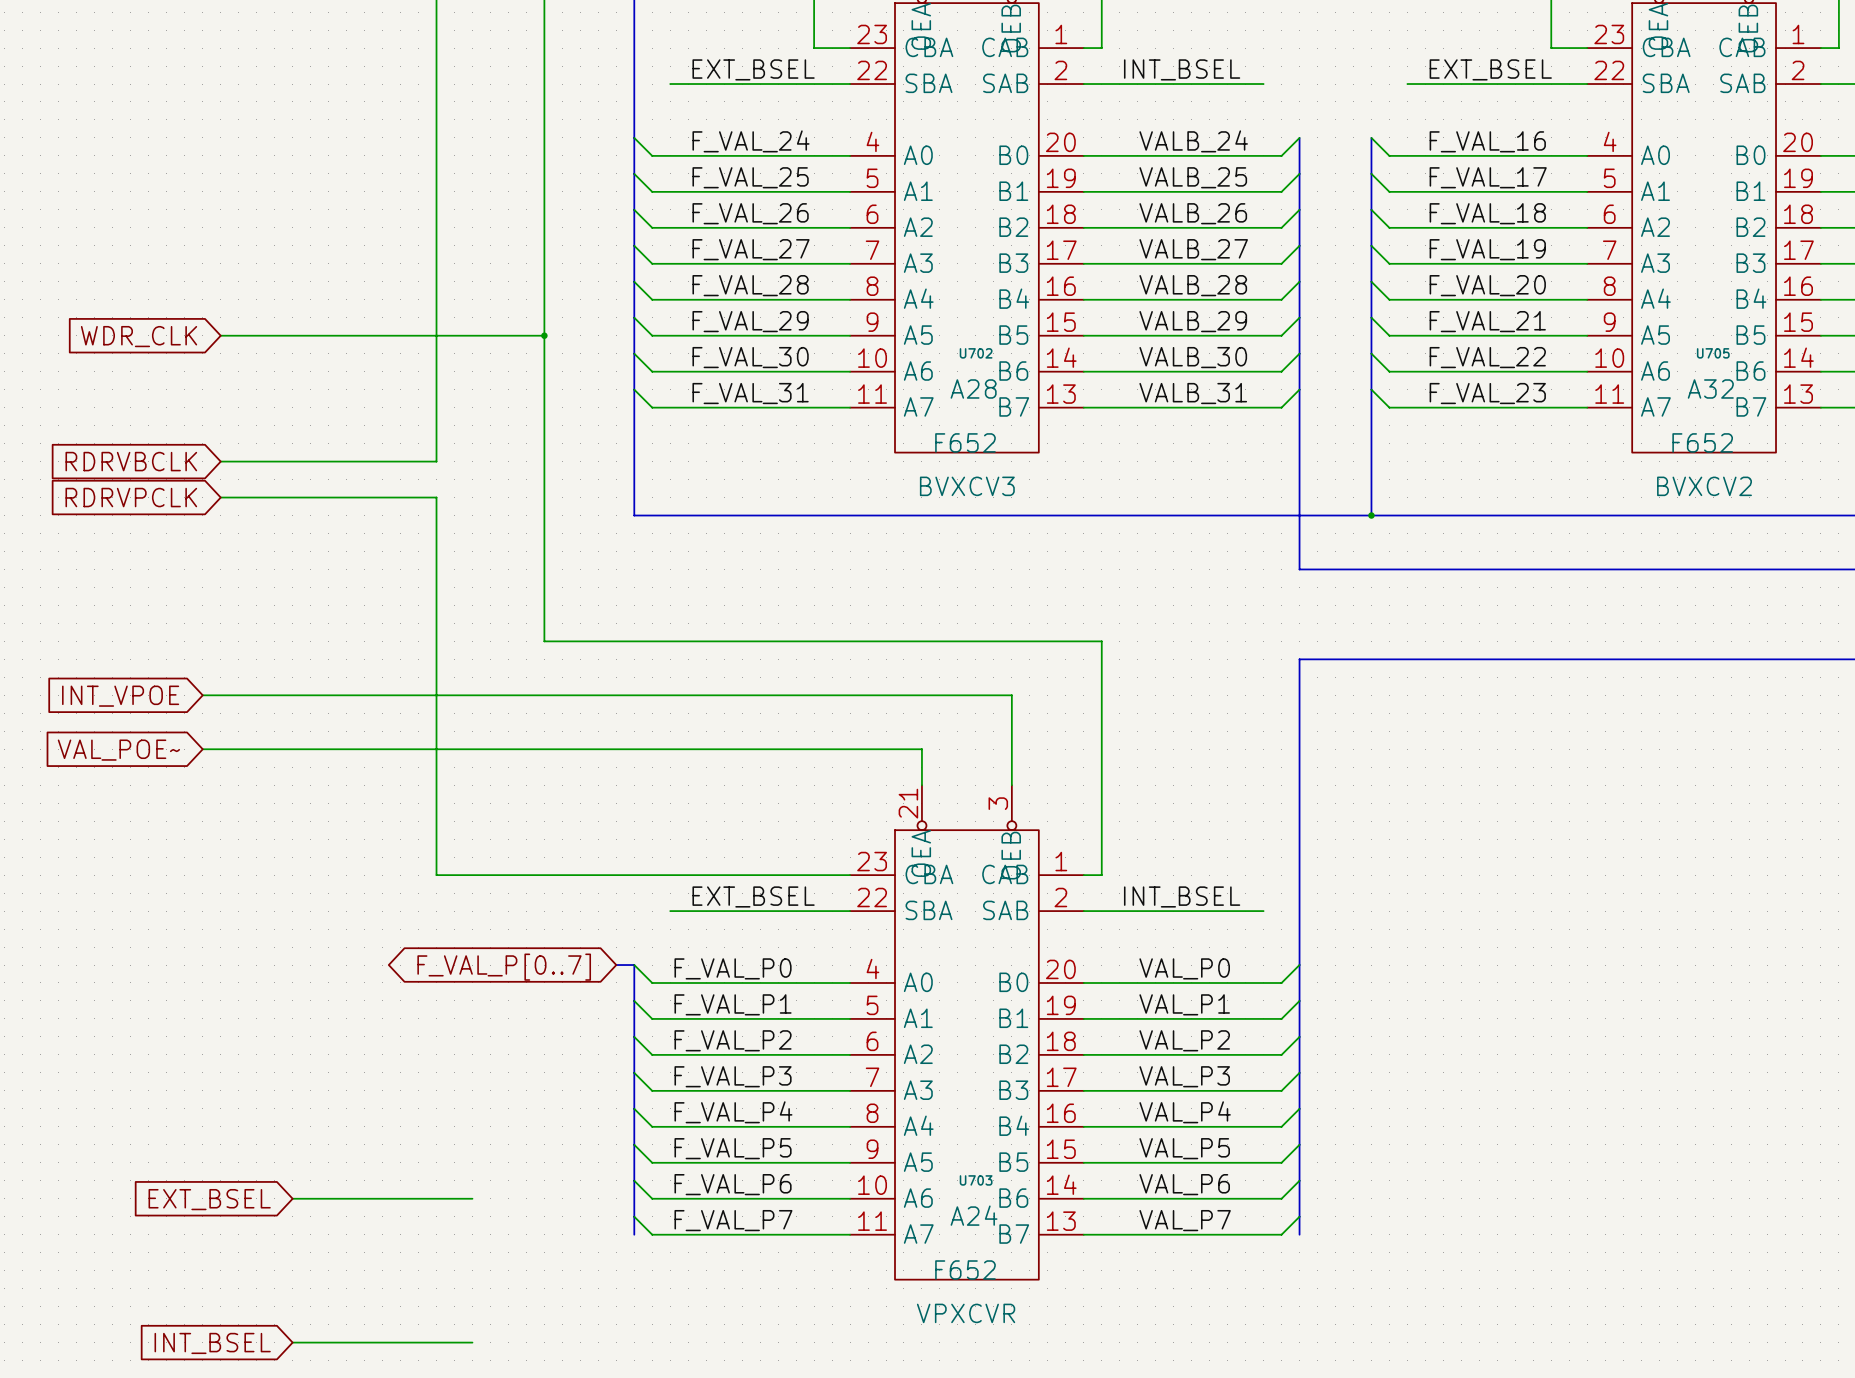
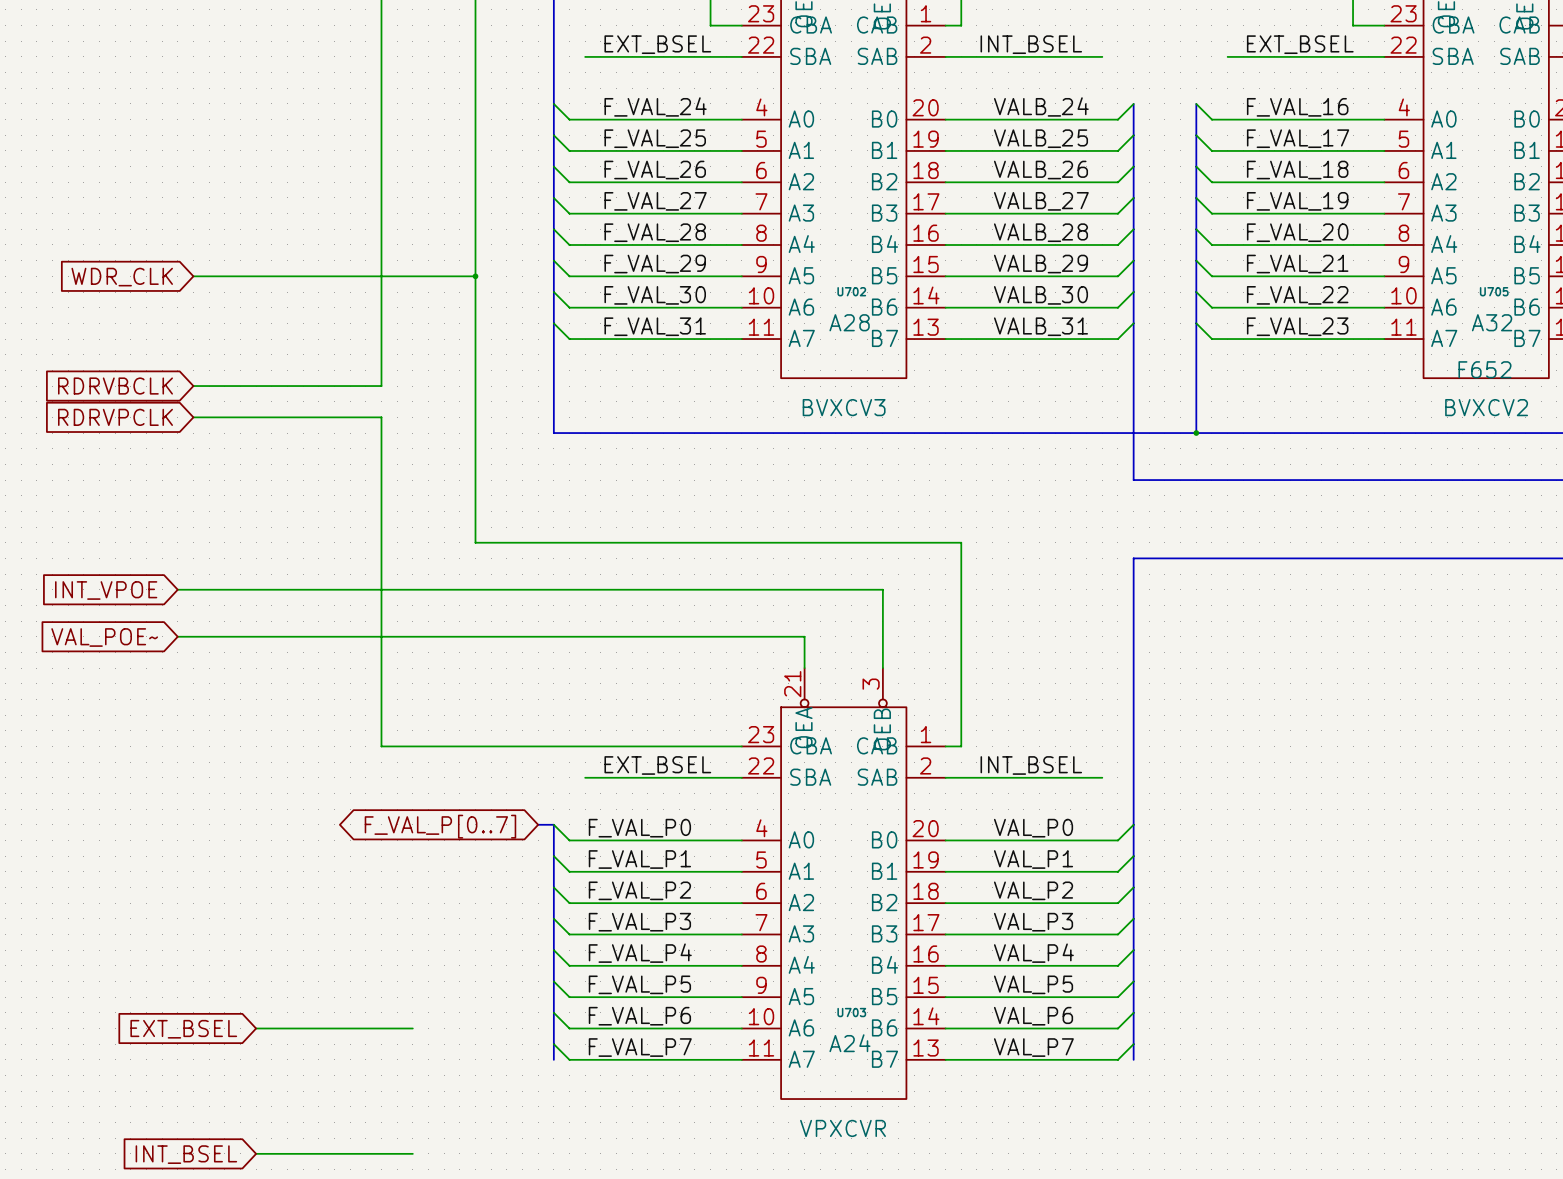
U702 value: F652 (965, 442) -> none
U703 value: F652 (965, 1270) -> none

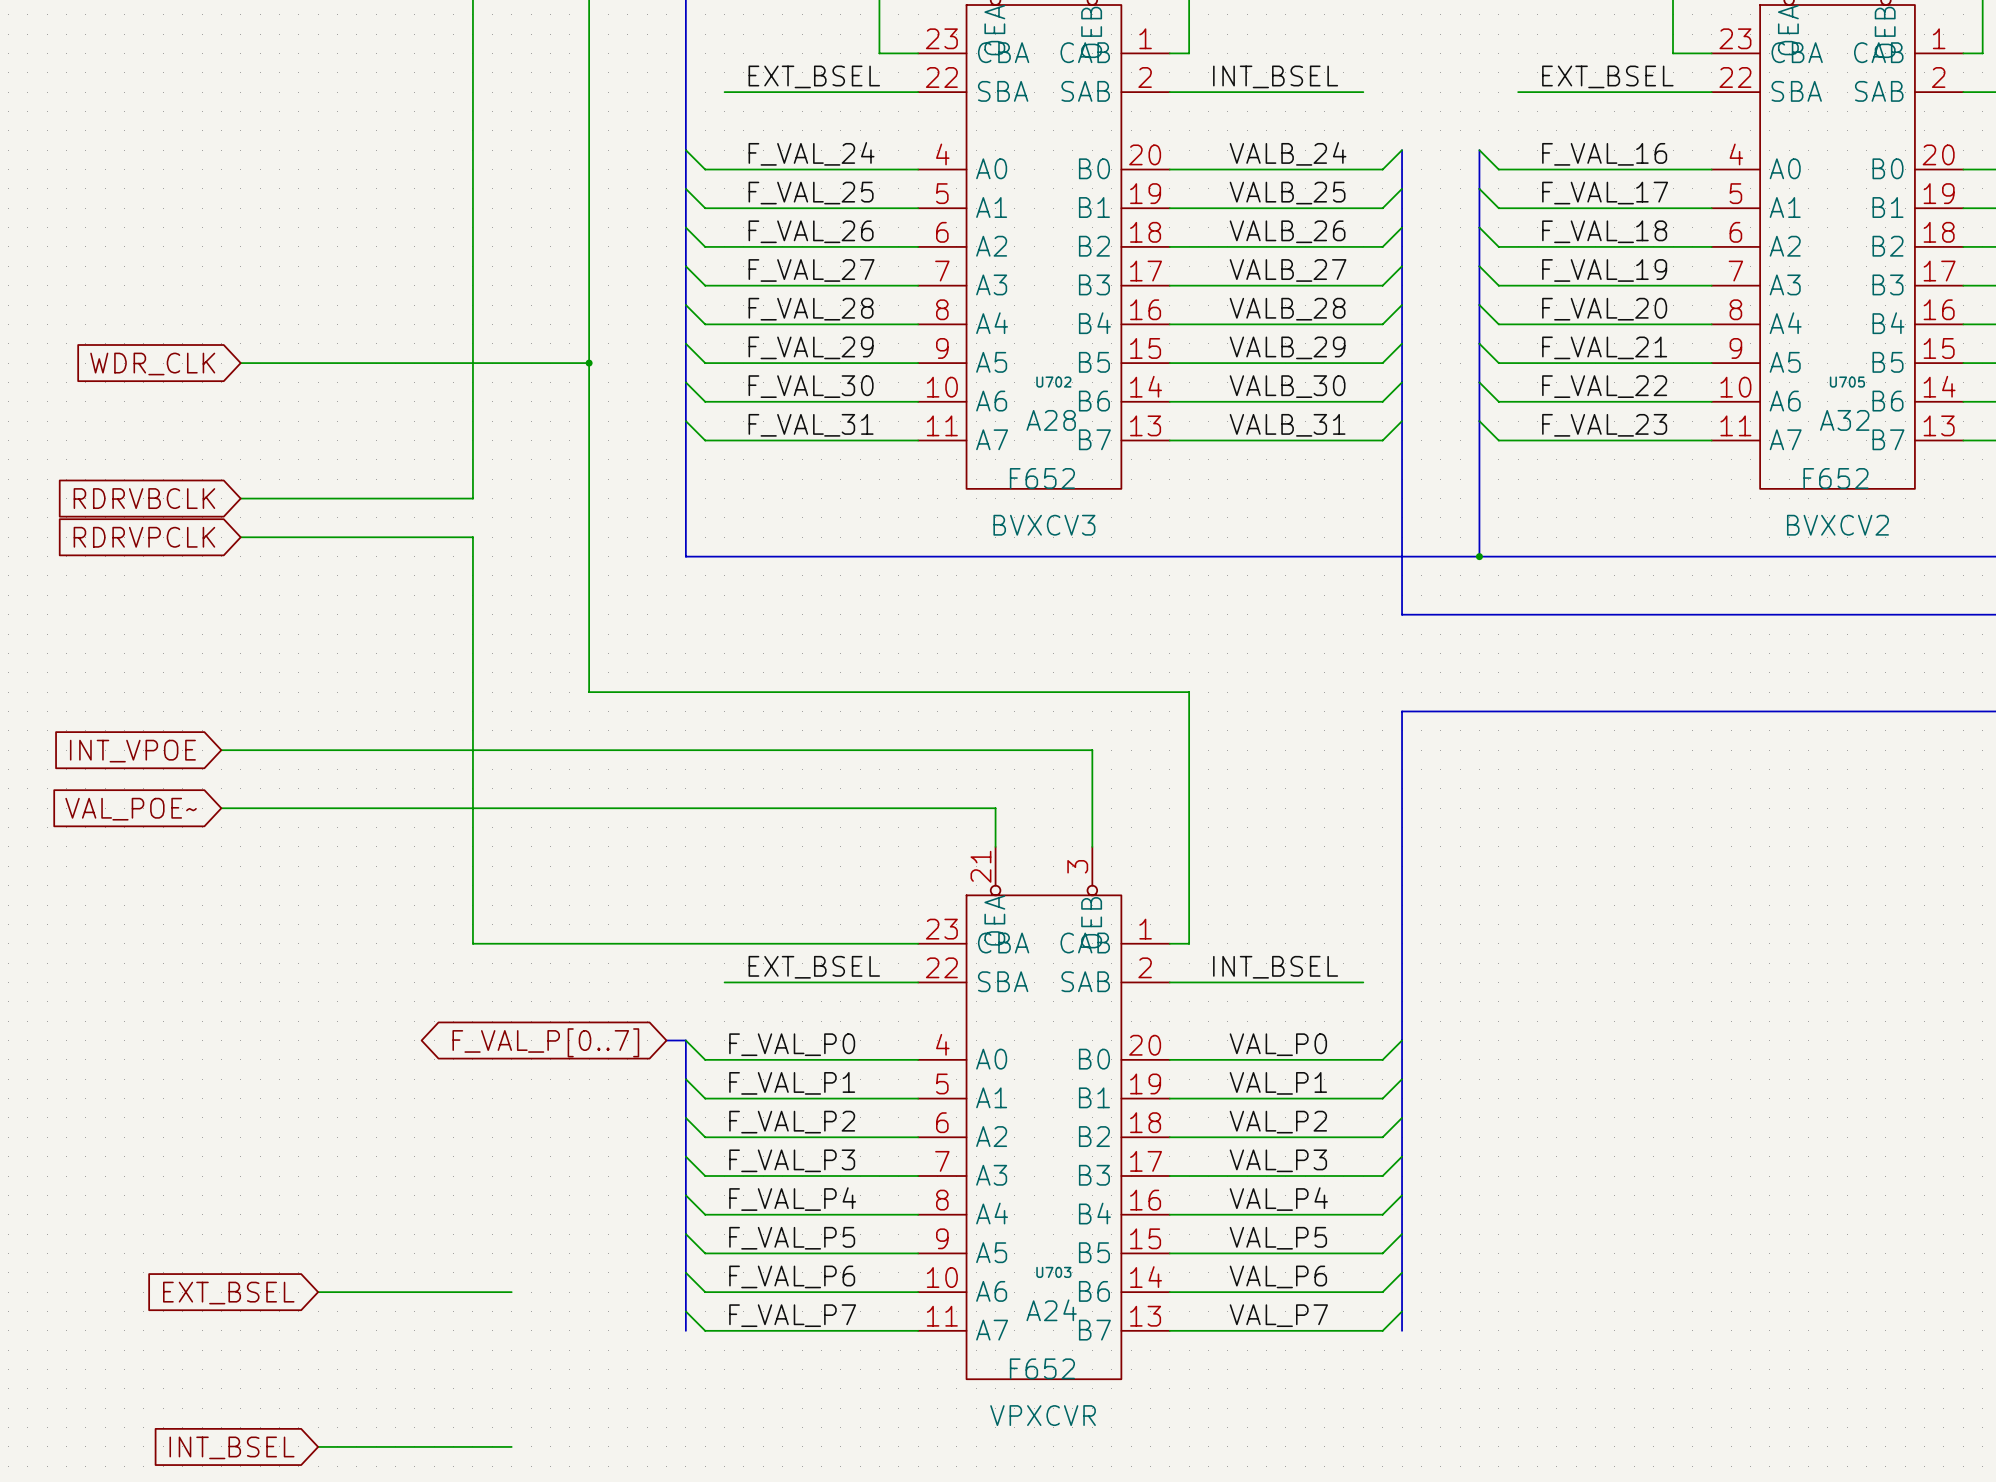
U702 value: none -> F652 (1042, 478)
U703 value: none -> F652 (1042, 1368)

